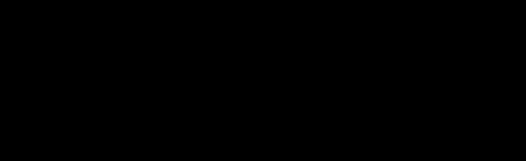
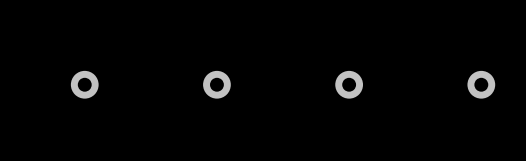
via: none -> (84, 84)
via: none -> (216, 84)
via: none -> (349, 84)
via: none -> (481, 84)

